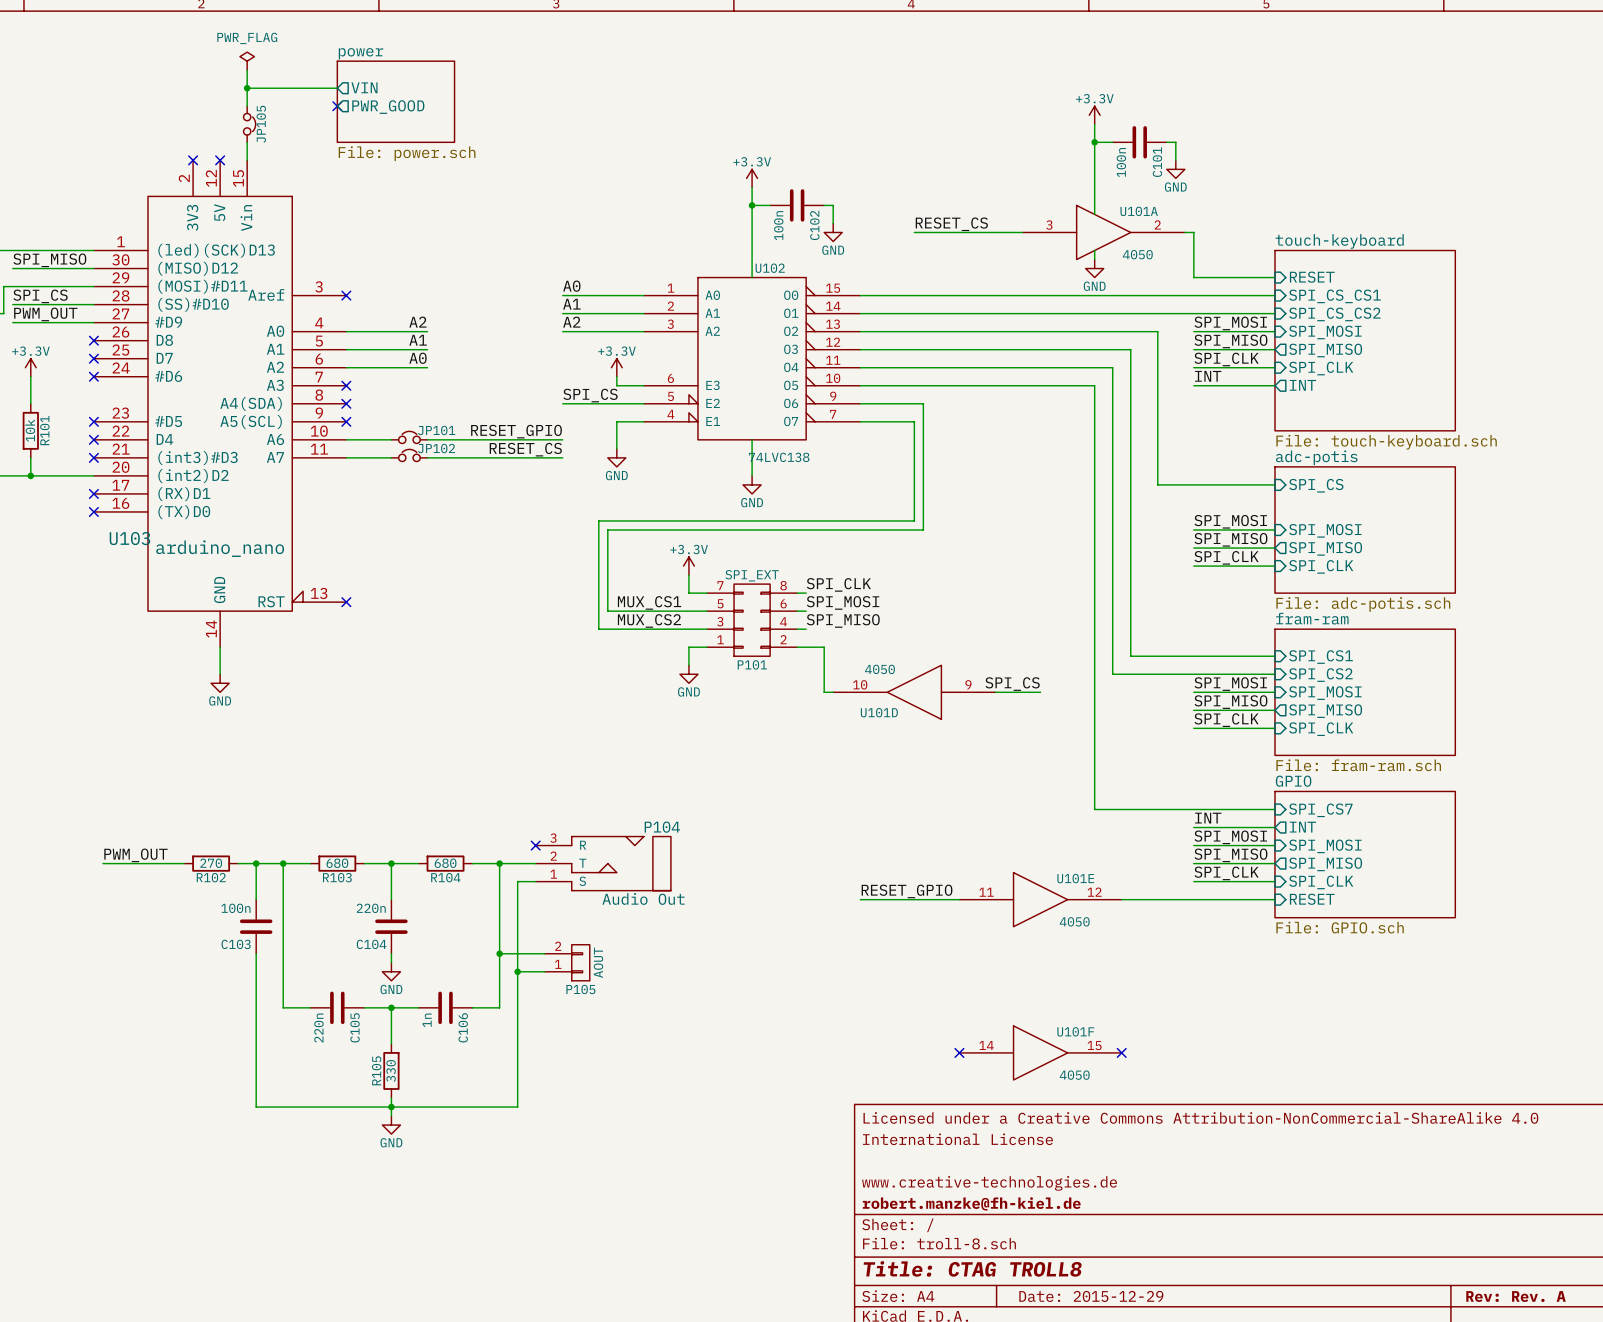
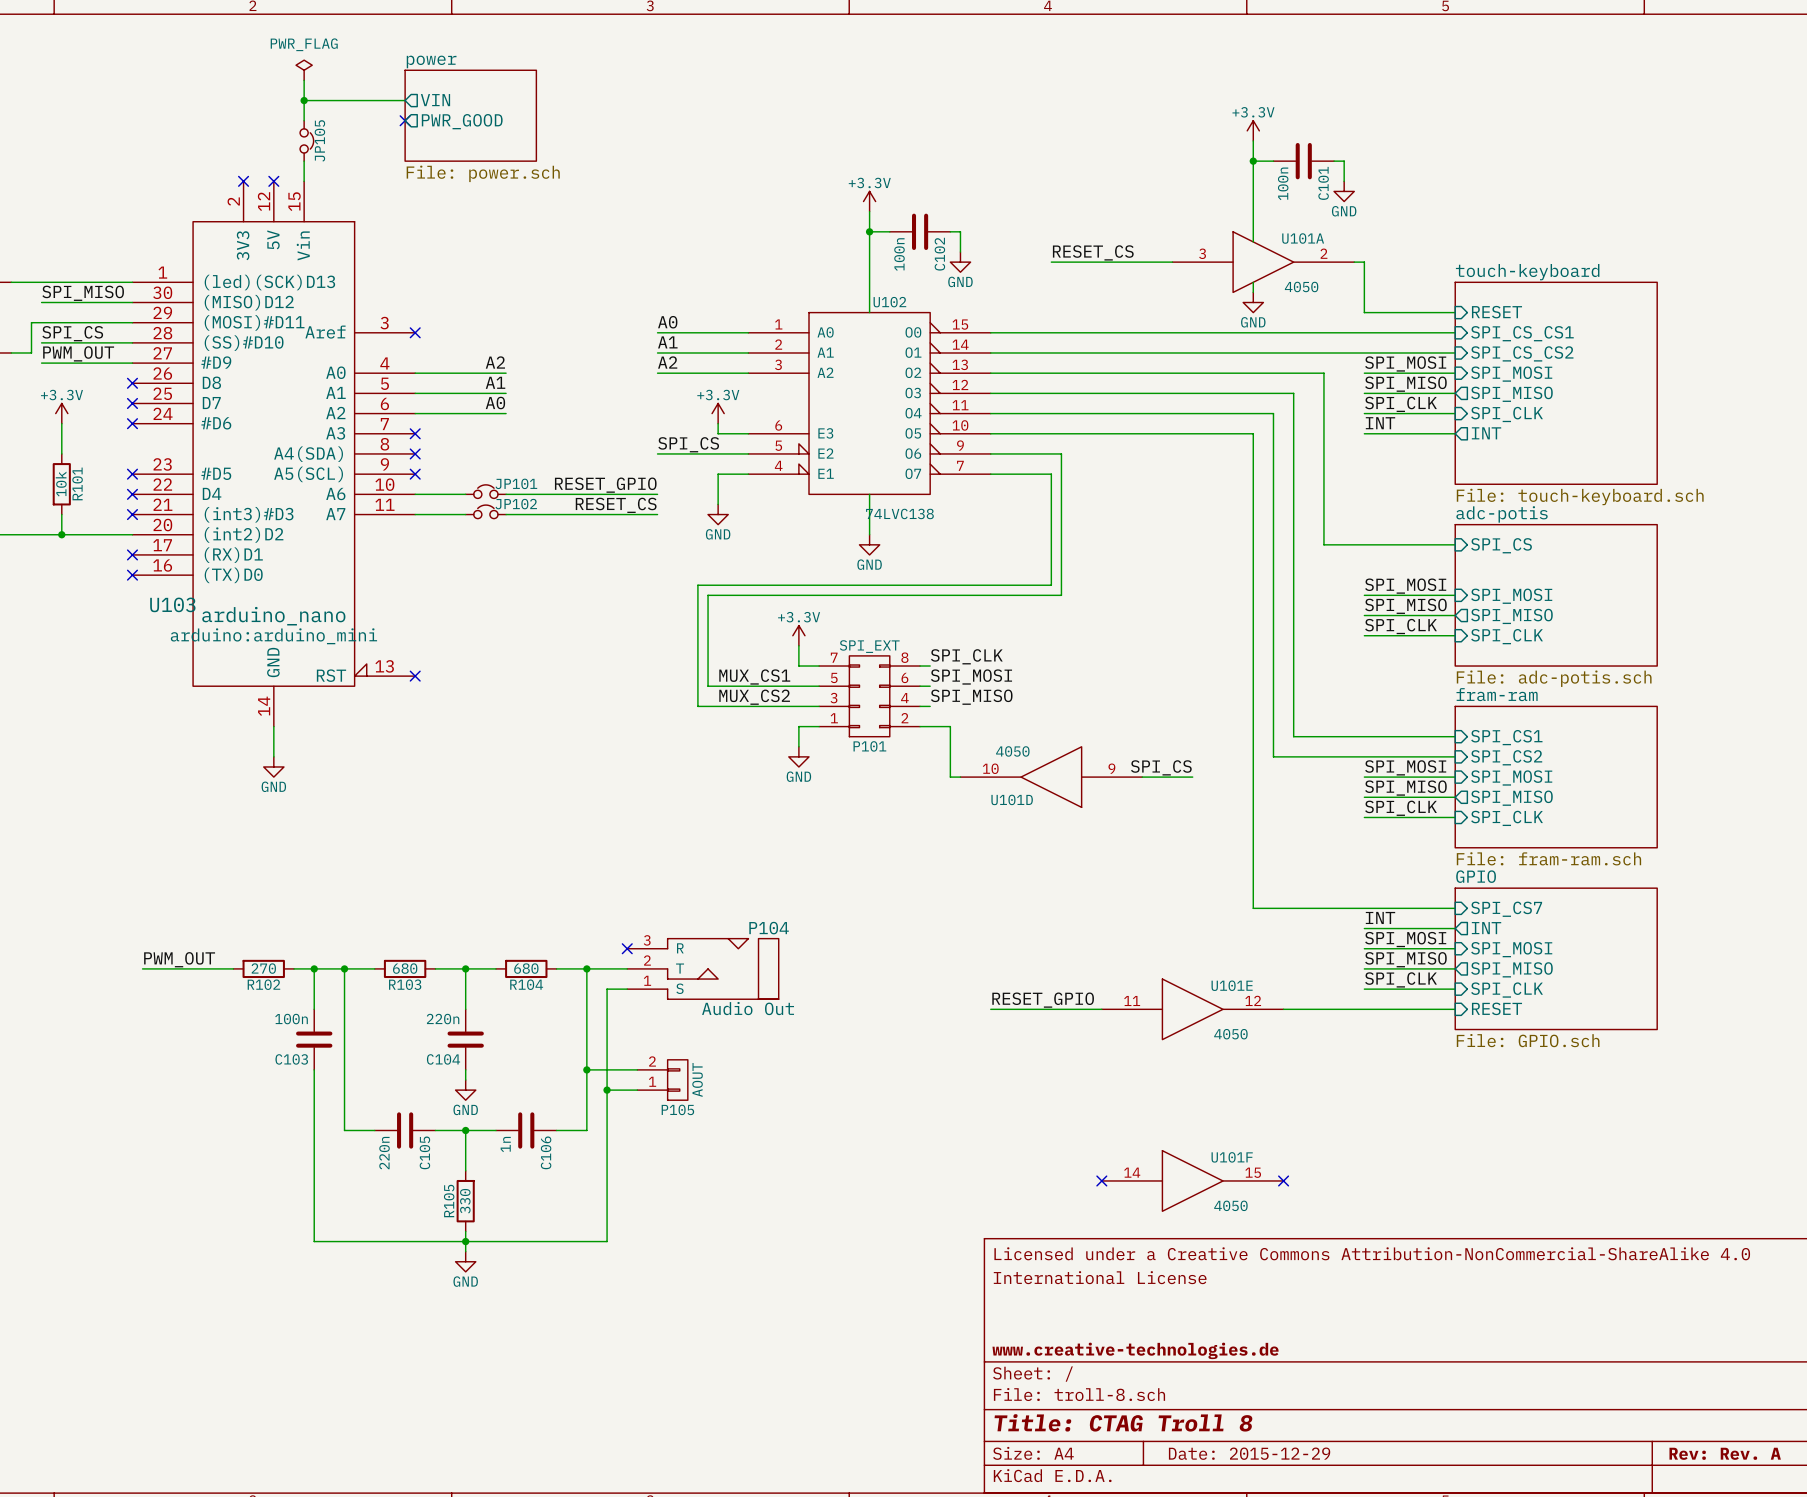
U103 text: none -> arduino:arduino_mini (273, 636)
title block: www.creative-technologies.de (989, 1183) -> none
title block: robert.manzke@fh-kiel.de (971, 1203) -> www.creative-technologies.de (1135, 1350)
title block: Title: CTAG TROLL8 (972, 1268) -> Title: CTAG Troll 8 (1123, 1422)

